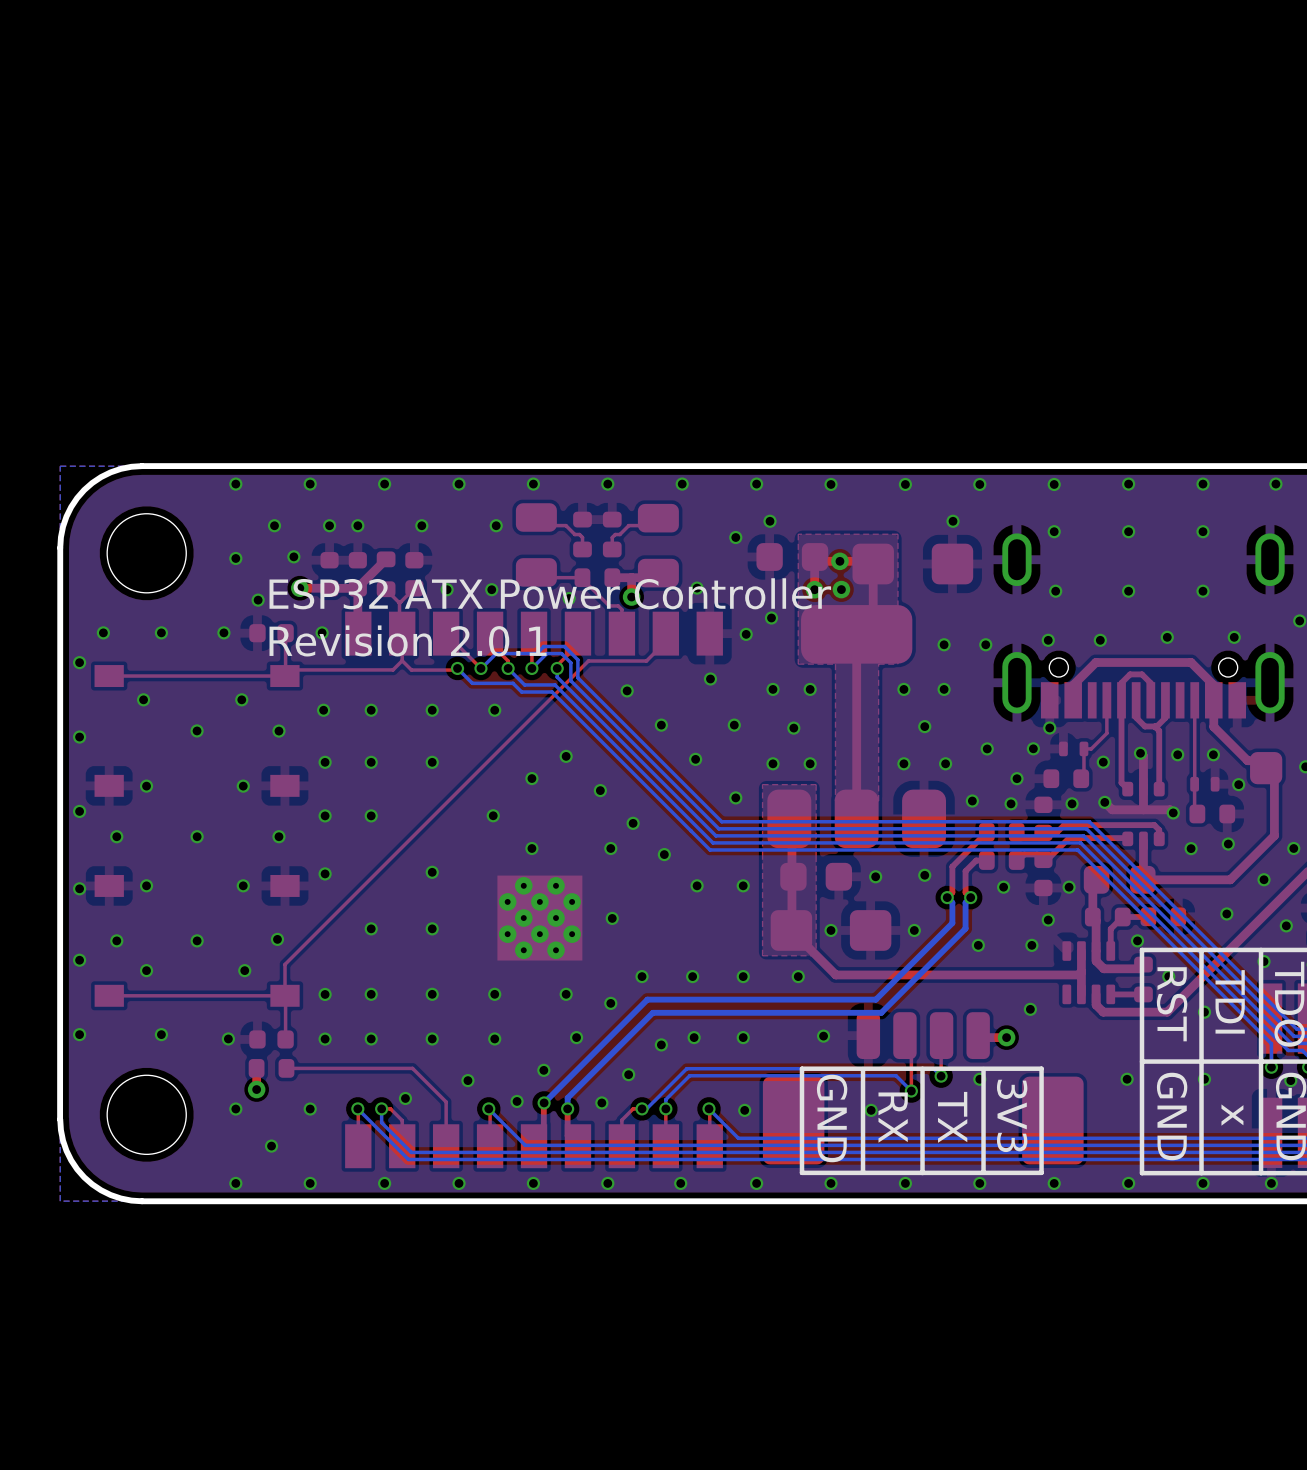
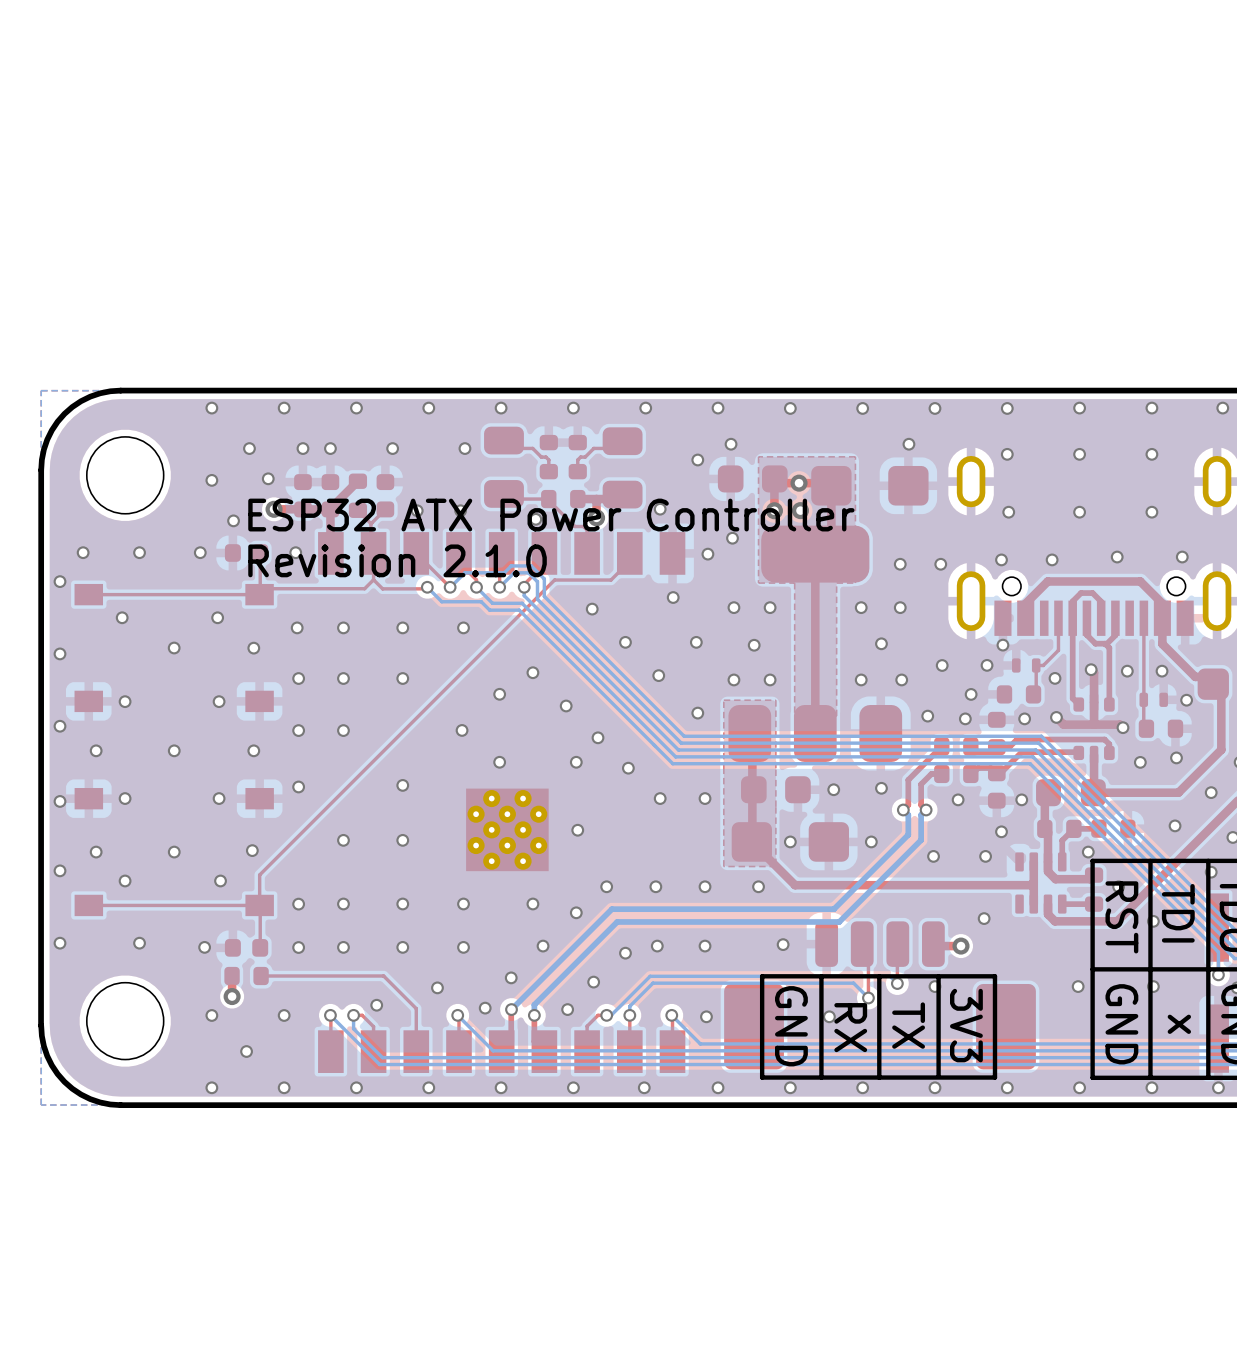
text: Revision 2.0.1 (408, 640) -> Revision 2.1.0 (397, 560)

